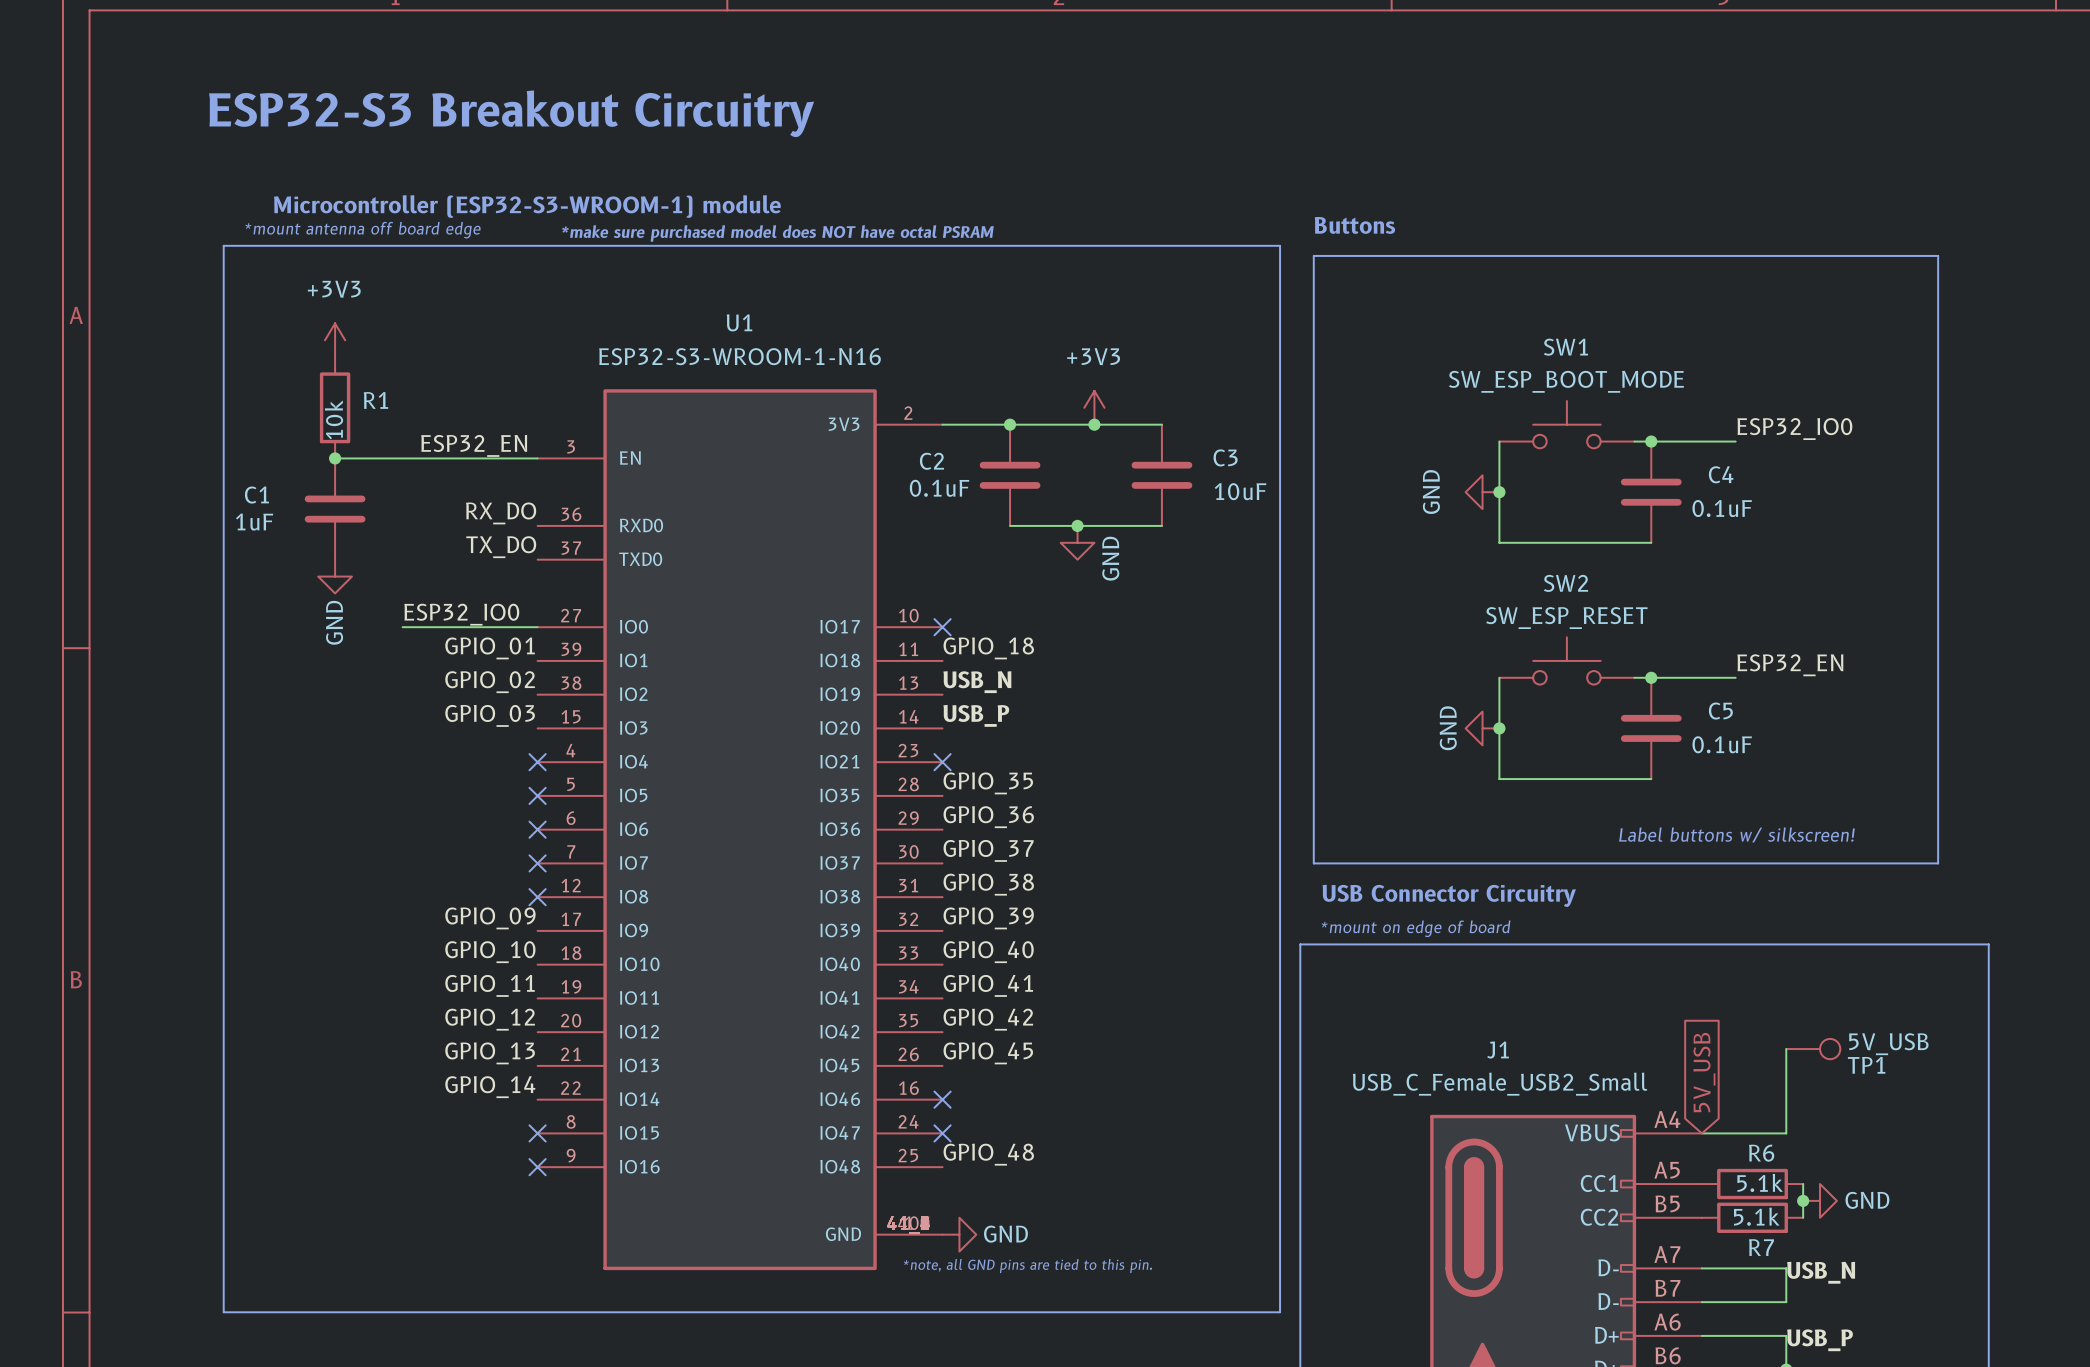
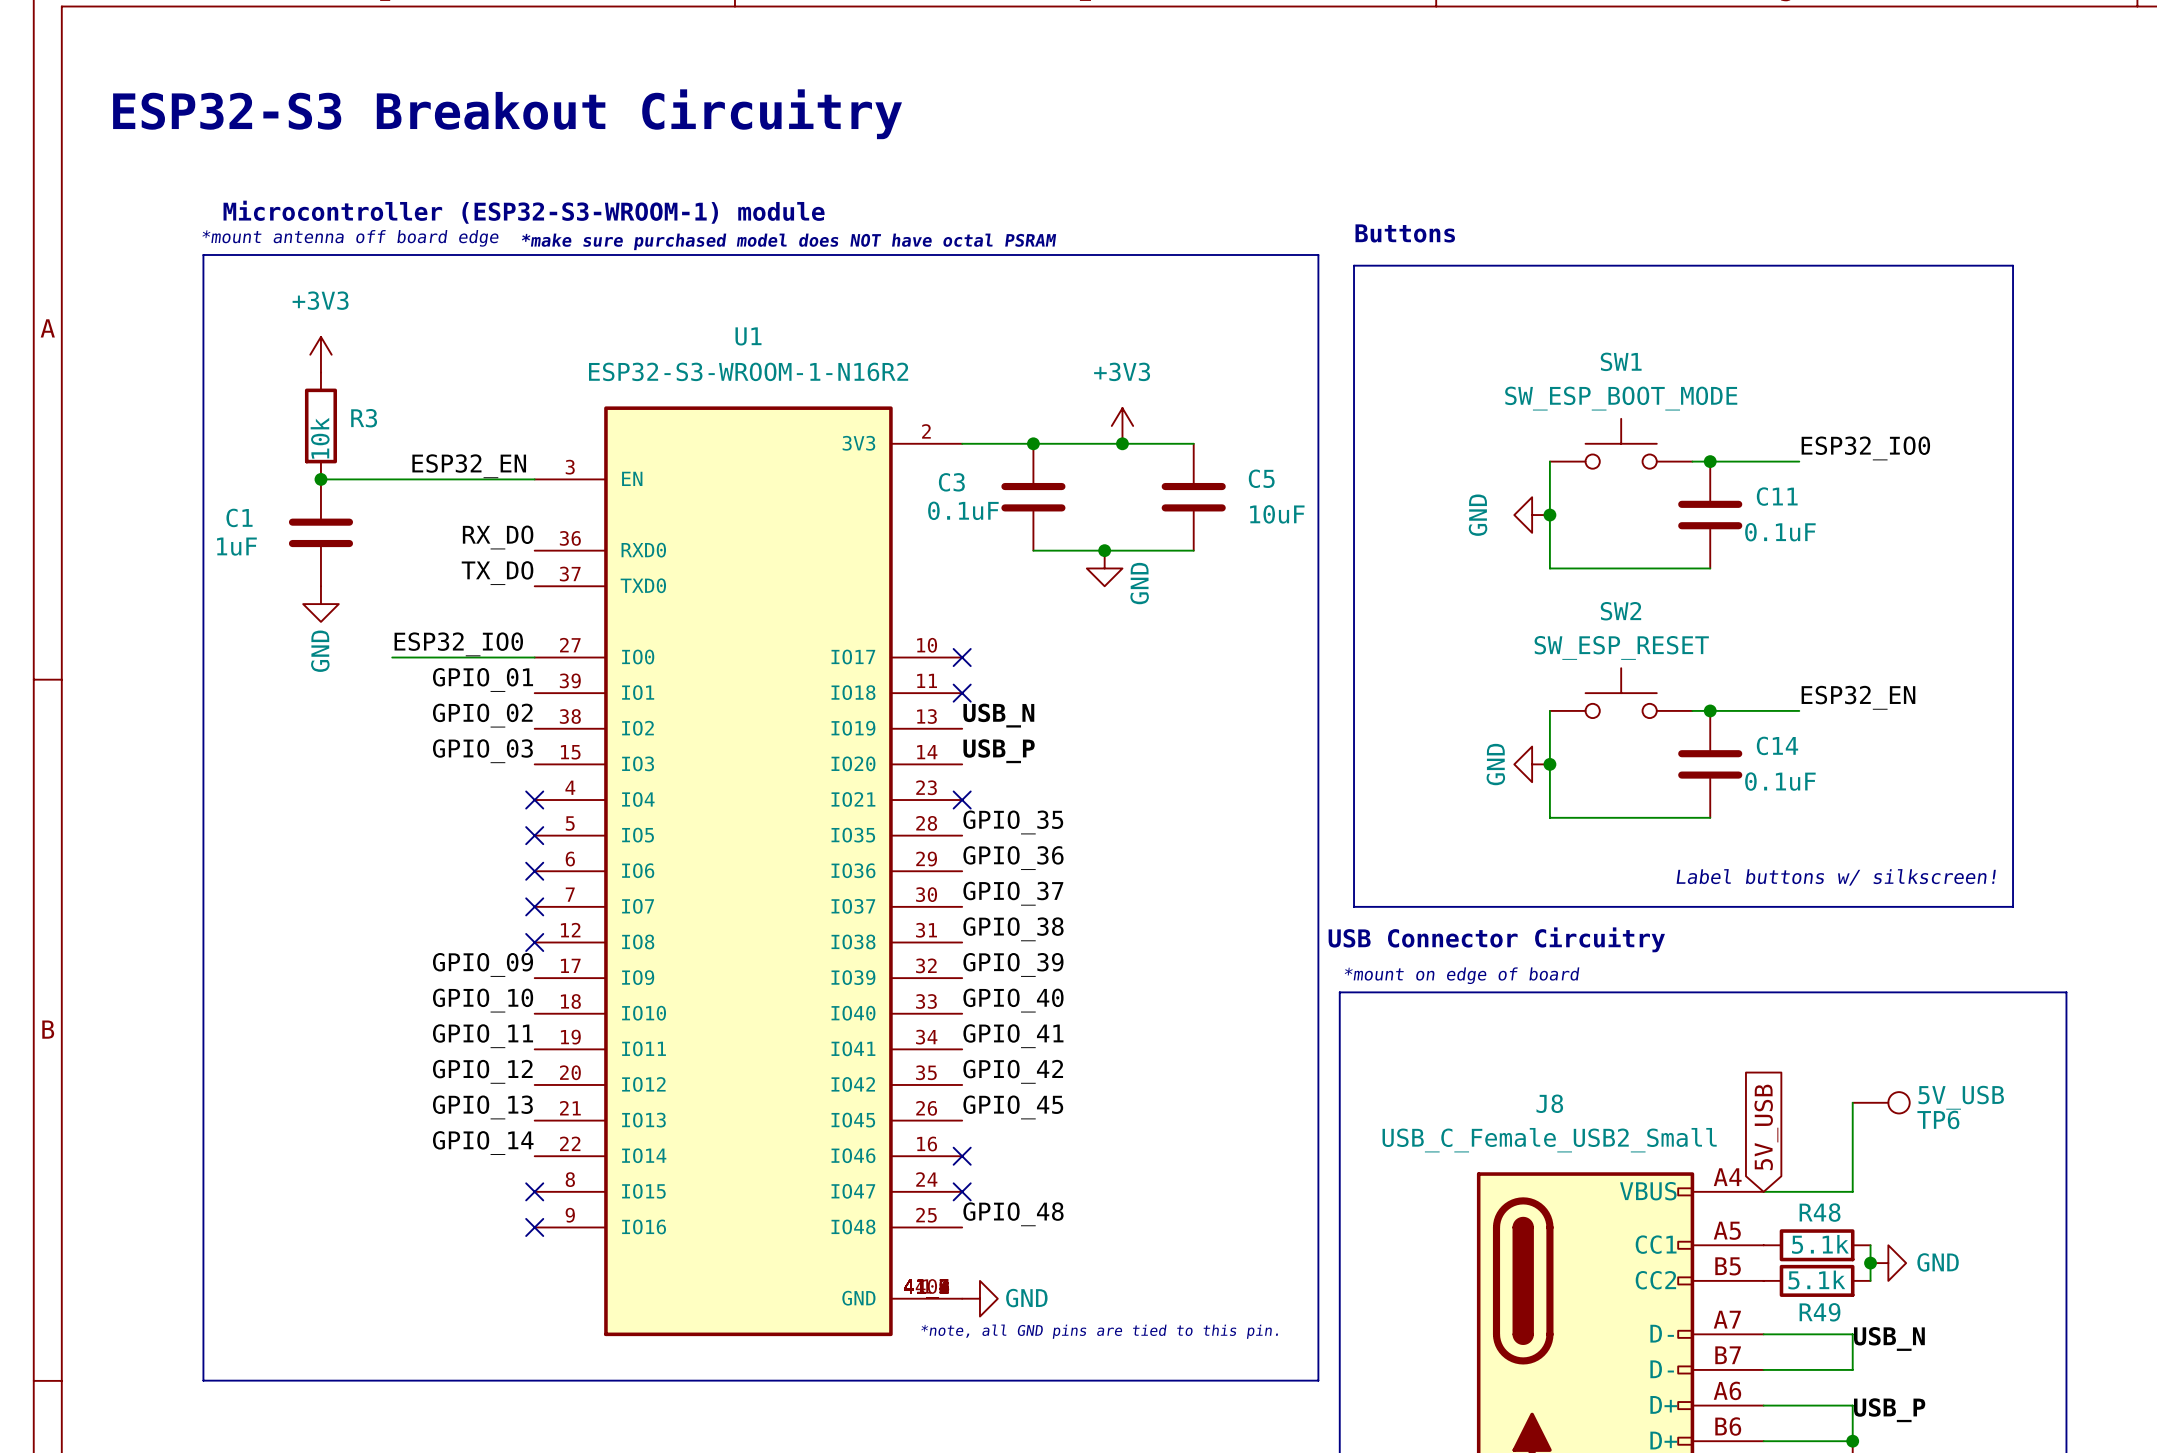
U1 value: ESP32-S3-WROOM-1-N16 (739, 356) -> ESP32-S3-WROOM-1-N16R2 (748, 371)
R1 name: R1 (375, 400) -> R3 (364, 418)
C3 name: C3 (1225, 457) -> C5 (1261, 478)
C2 name: C2 (931, 461) -> C3 (951, 482)
C4 name: C4 (1721, 474) -> C11 (1777, 496)
label: GPIO_18 (988, 648) -> none
no-connect mark: none -> (962, 693)
C5 name: C5 (1720, 711) -> C14 (1777, 745)
J1 name: J1 (1498, 1050) -> J8 (1549, 1103)
TP1 name: TP1 (1866, 1065) -> TP6 (1938, 1119)
R6 name: R6 (1761, 1153) -> R48 (1820, 1212)
R7 name: R7 (1761, 1247) -> R49 (1820, 1312)

